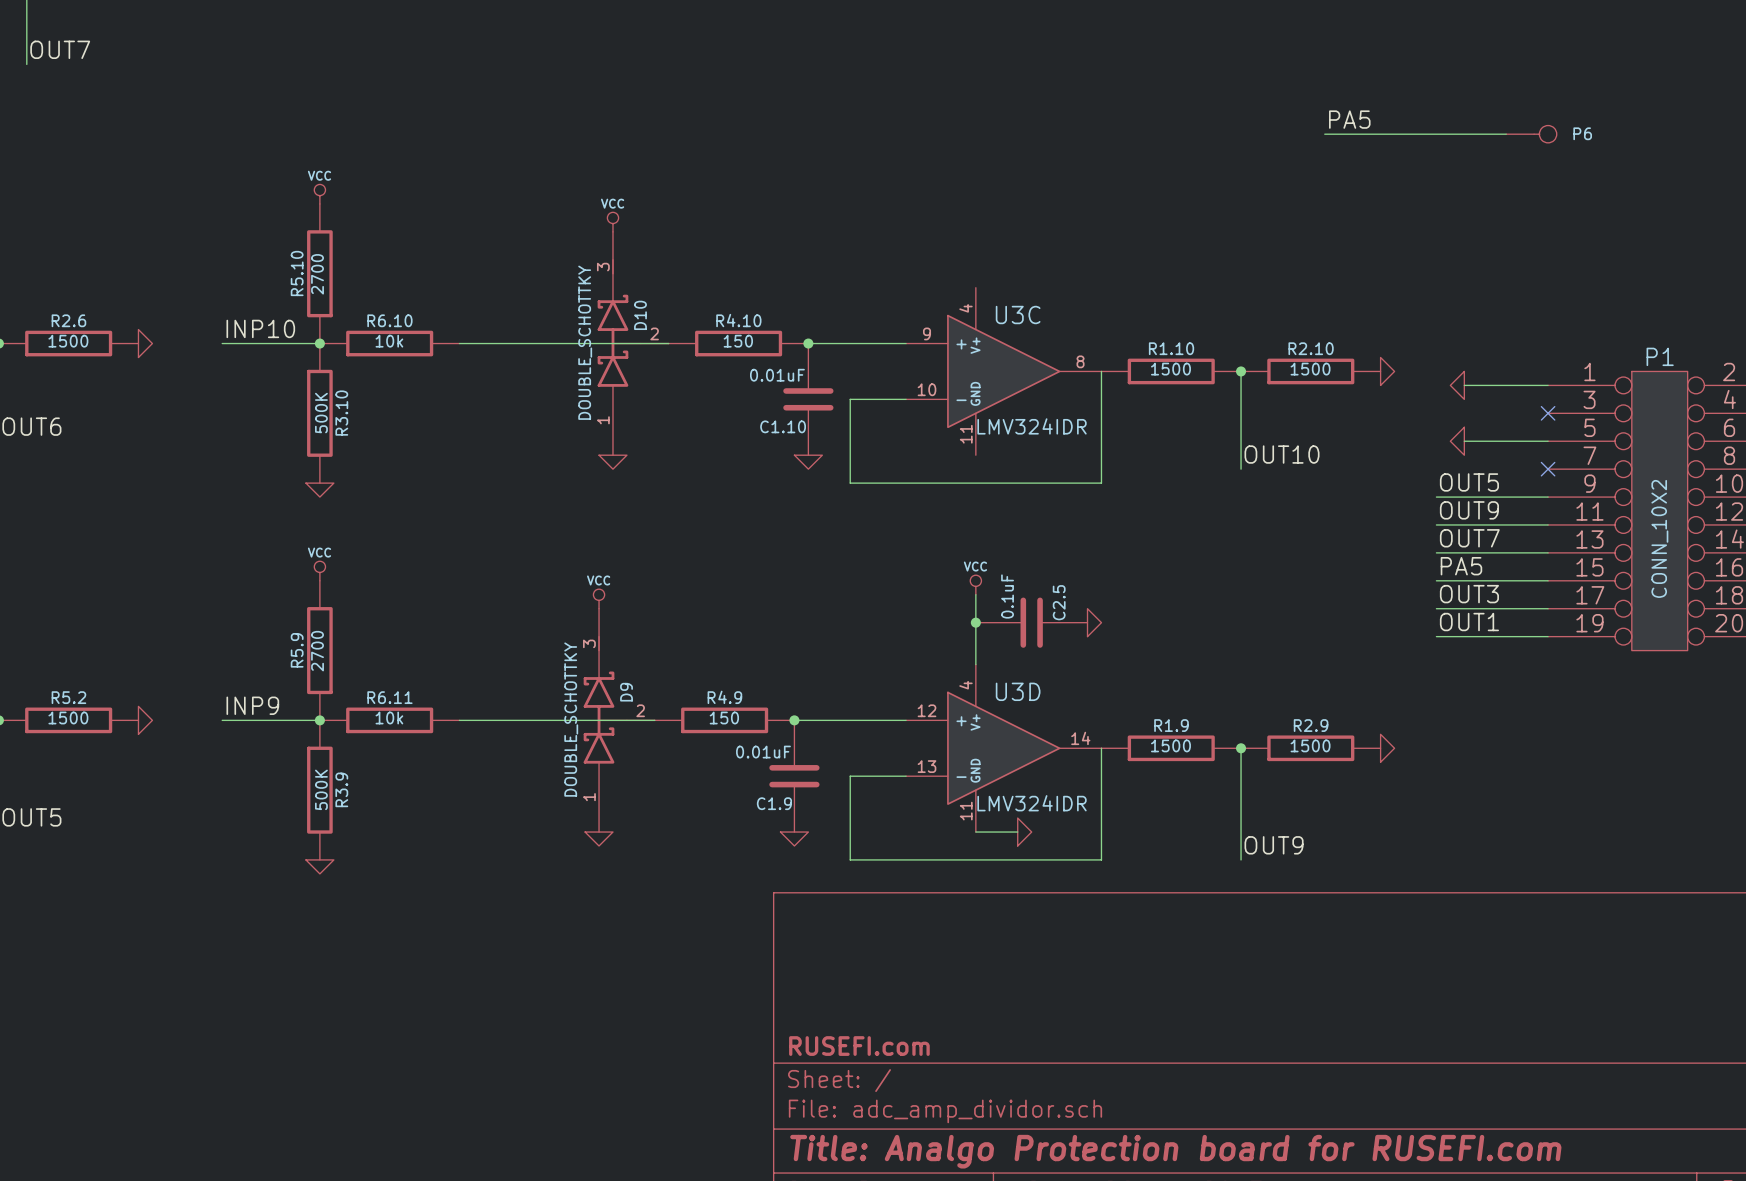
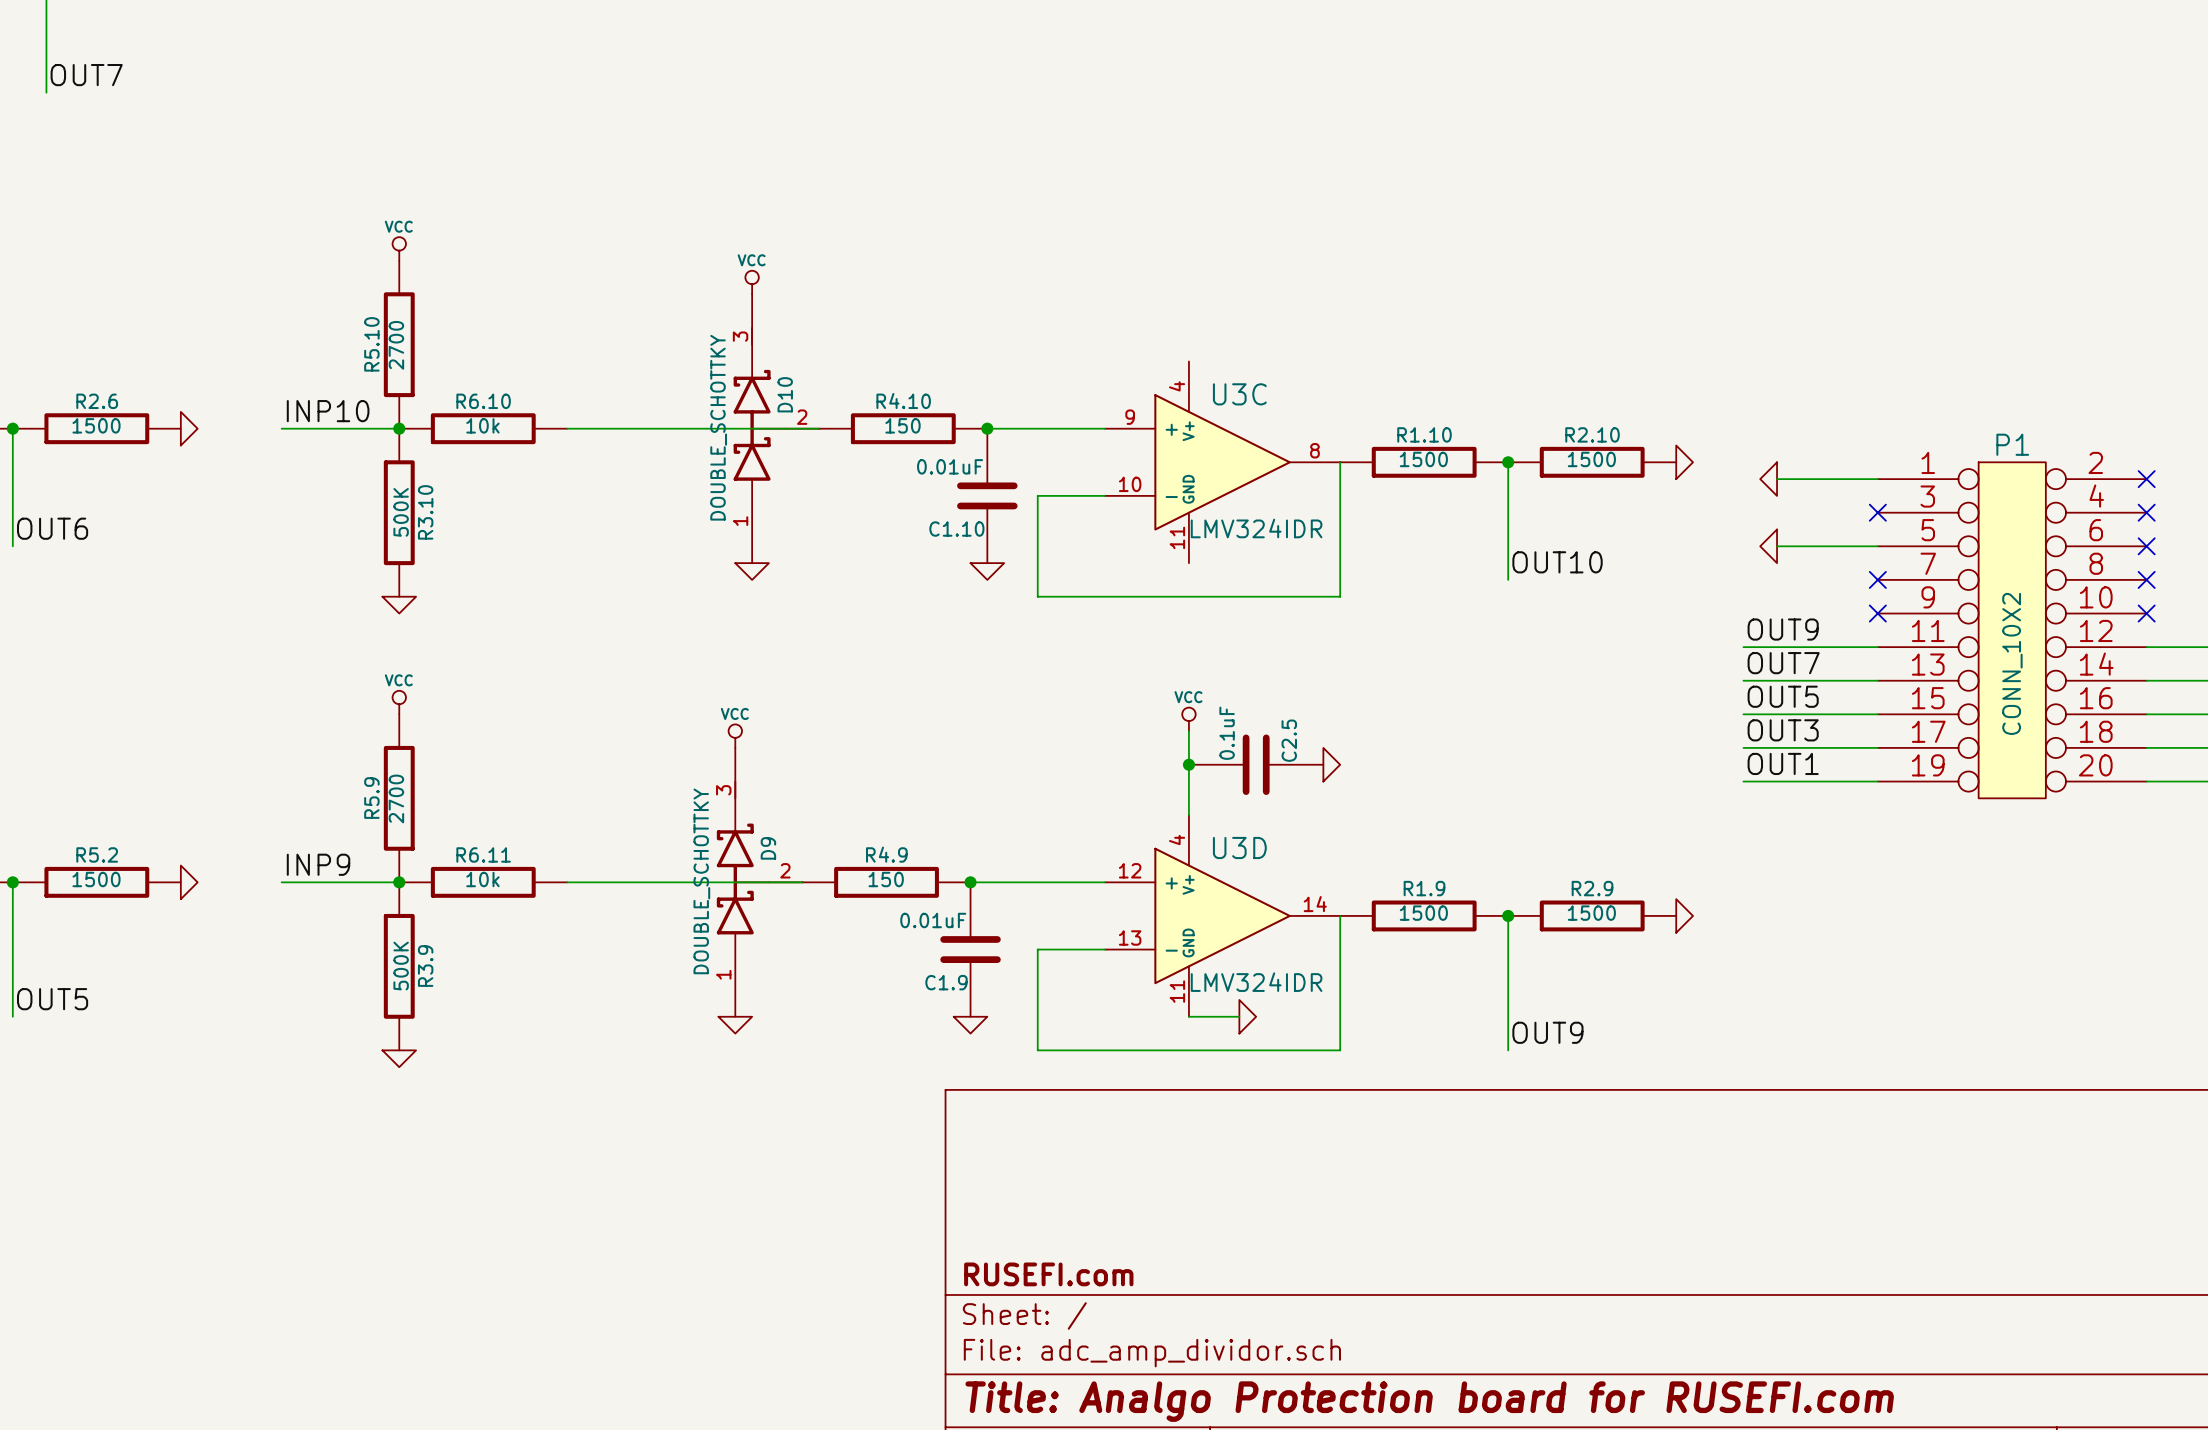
label: PA5 (1349, 119) -> none
wire: (1324, 134) (1506, 134) -> none
P6: (1531, 134) -> none
label: OUT5 (1469, 482) -> none
wire: (1436, 497) (1548, 497) -> none
no-connect mark: none -> (1877, 613)
label: PA5 (1461, 566) -> OUT5 (1783, 696)

